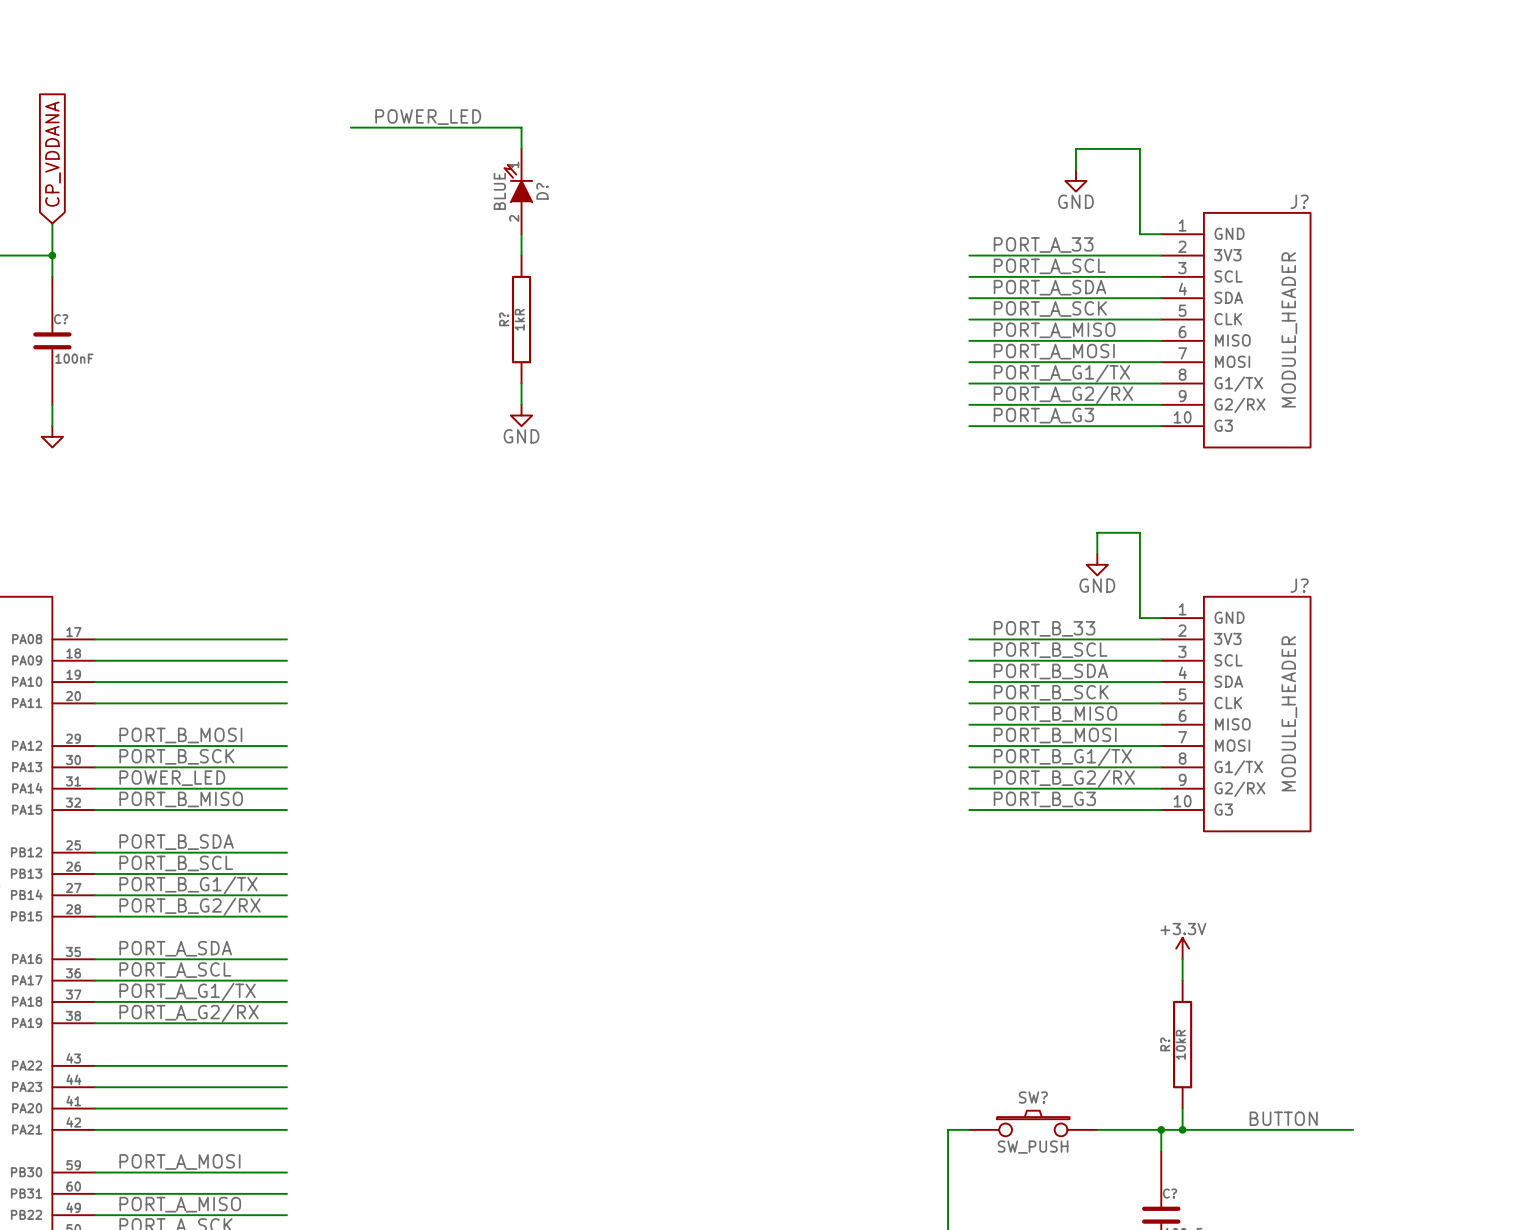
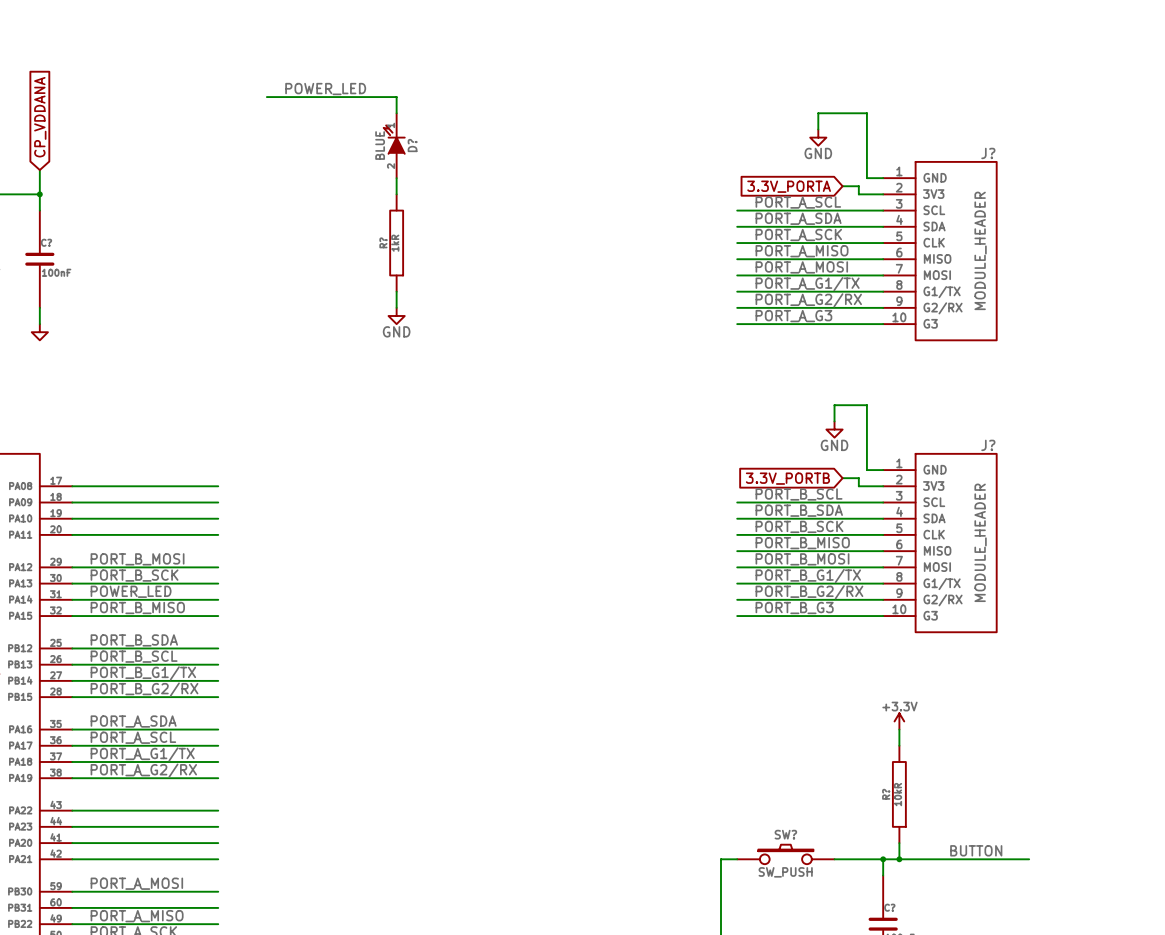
global label: none -> 3.3V_PORTA (789, 186)
label: PORT_A_33 (1043, 245) -> none
wire: (969, 255) (1129, 255) -> (842, 186) (858, 186) (858, 194)
label: PORT_B_33 (1044, 628) -> none
global label: none -> 3.3V_PORTB (787, 478)
wire: (969, 639) (1129, 639) -> (842, 478) (858, 478) (858, 486)

